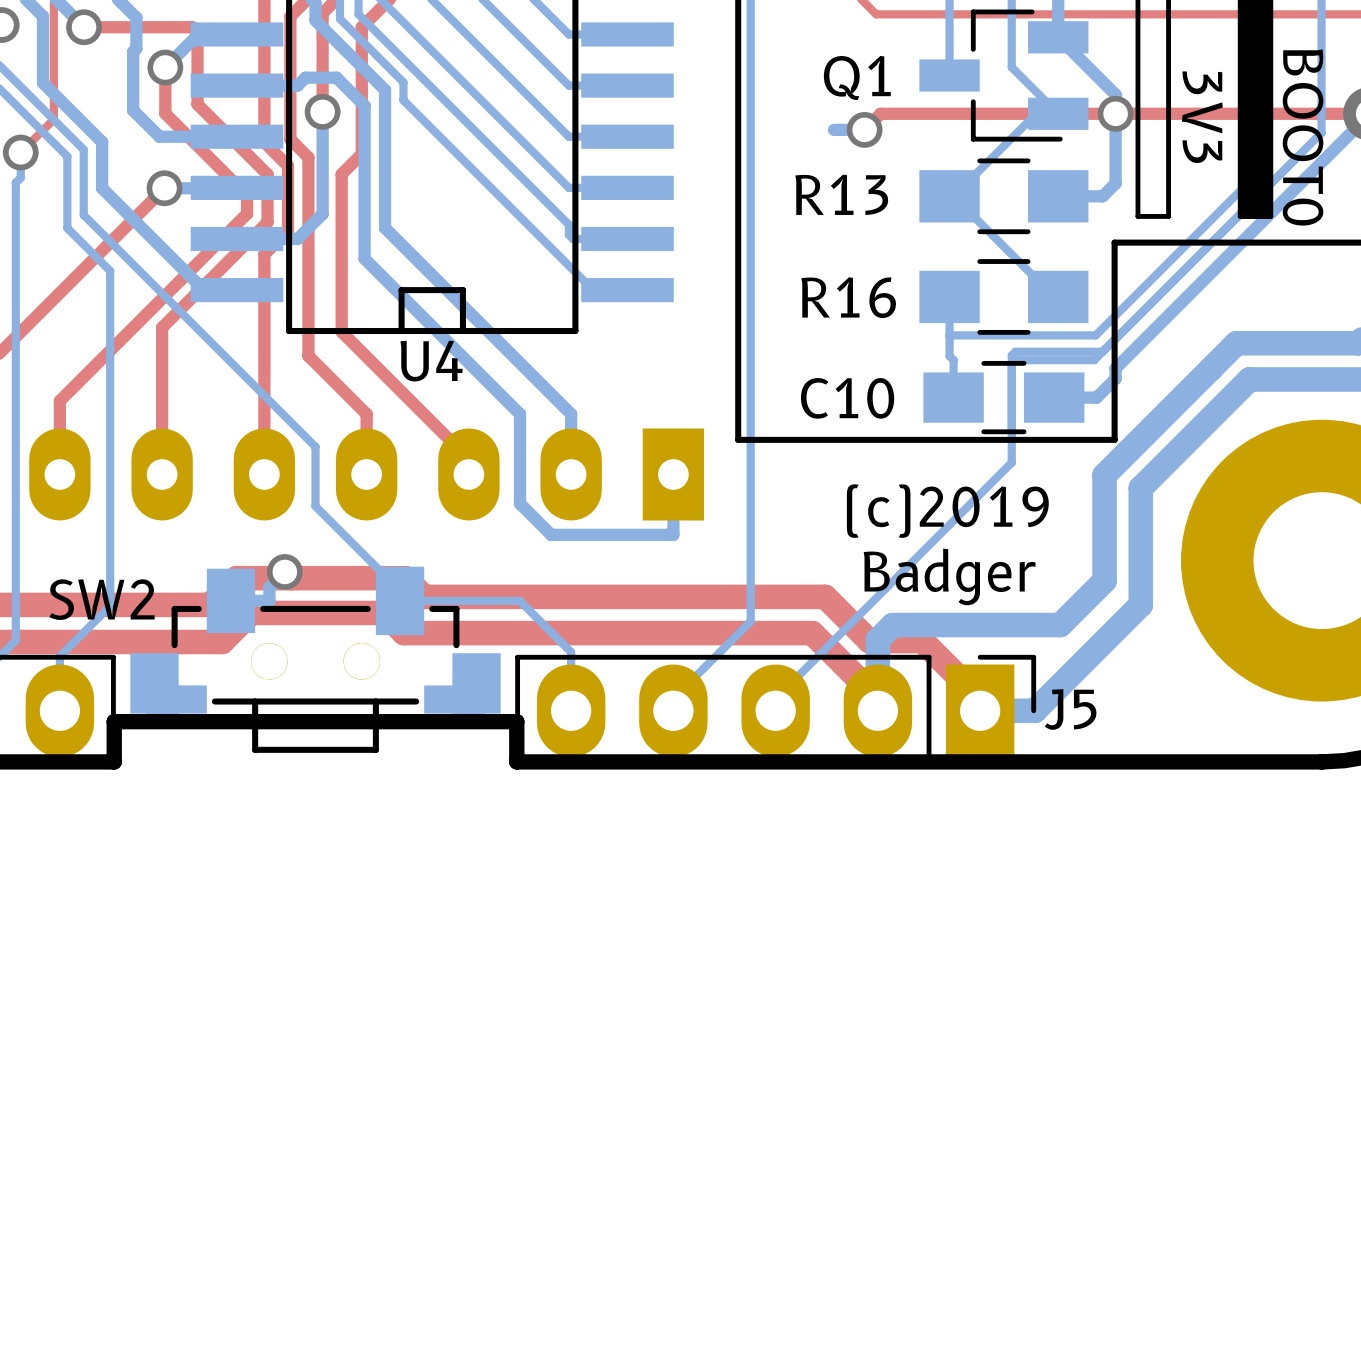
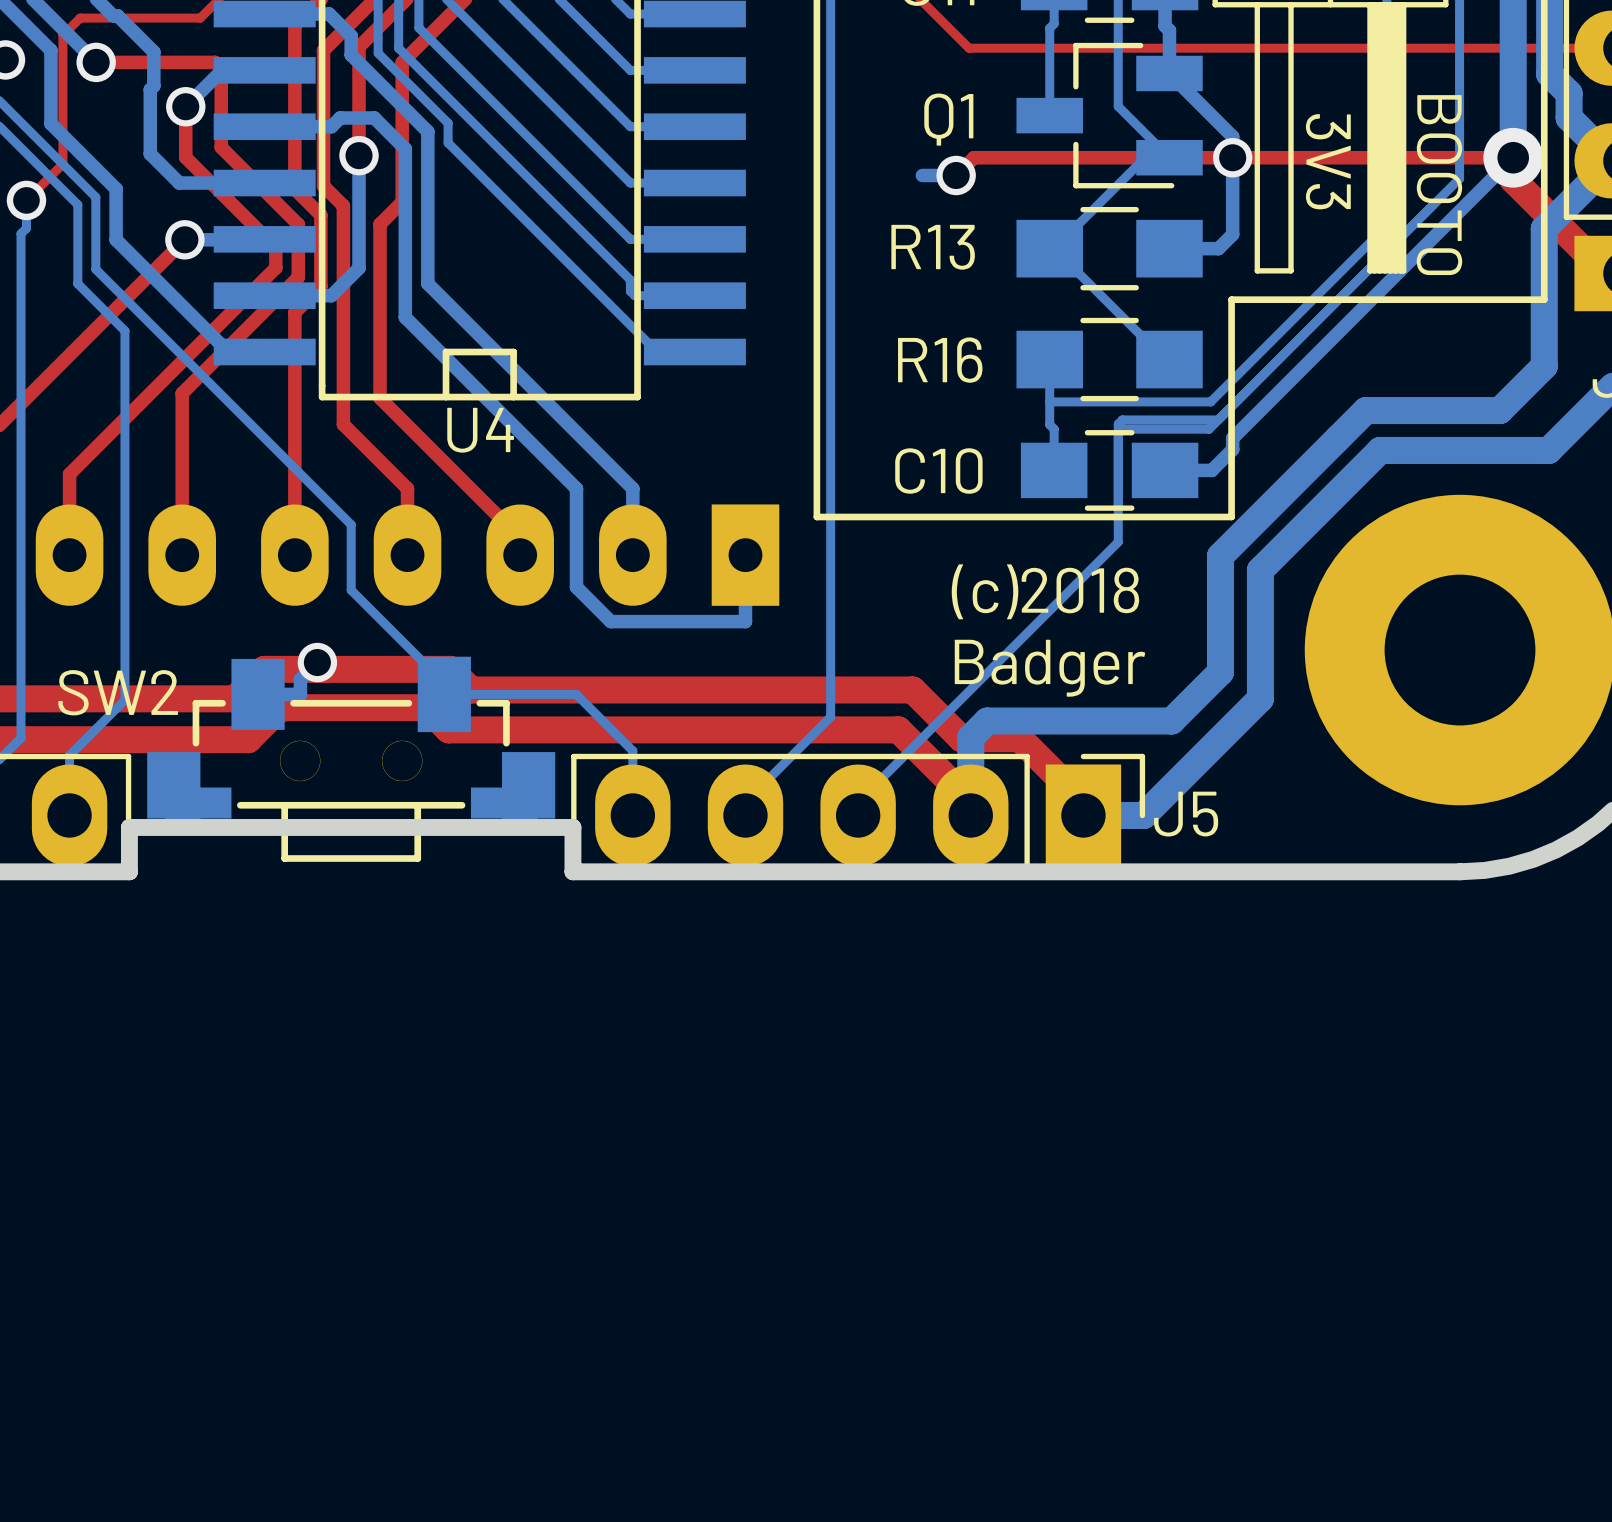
text: (c)2019 (947, 511) -> (c)2018 (1045, 591)

